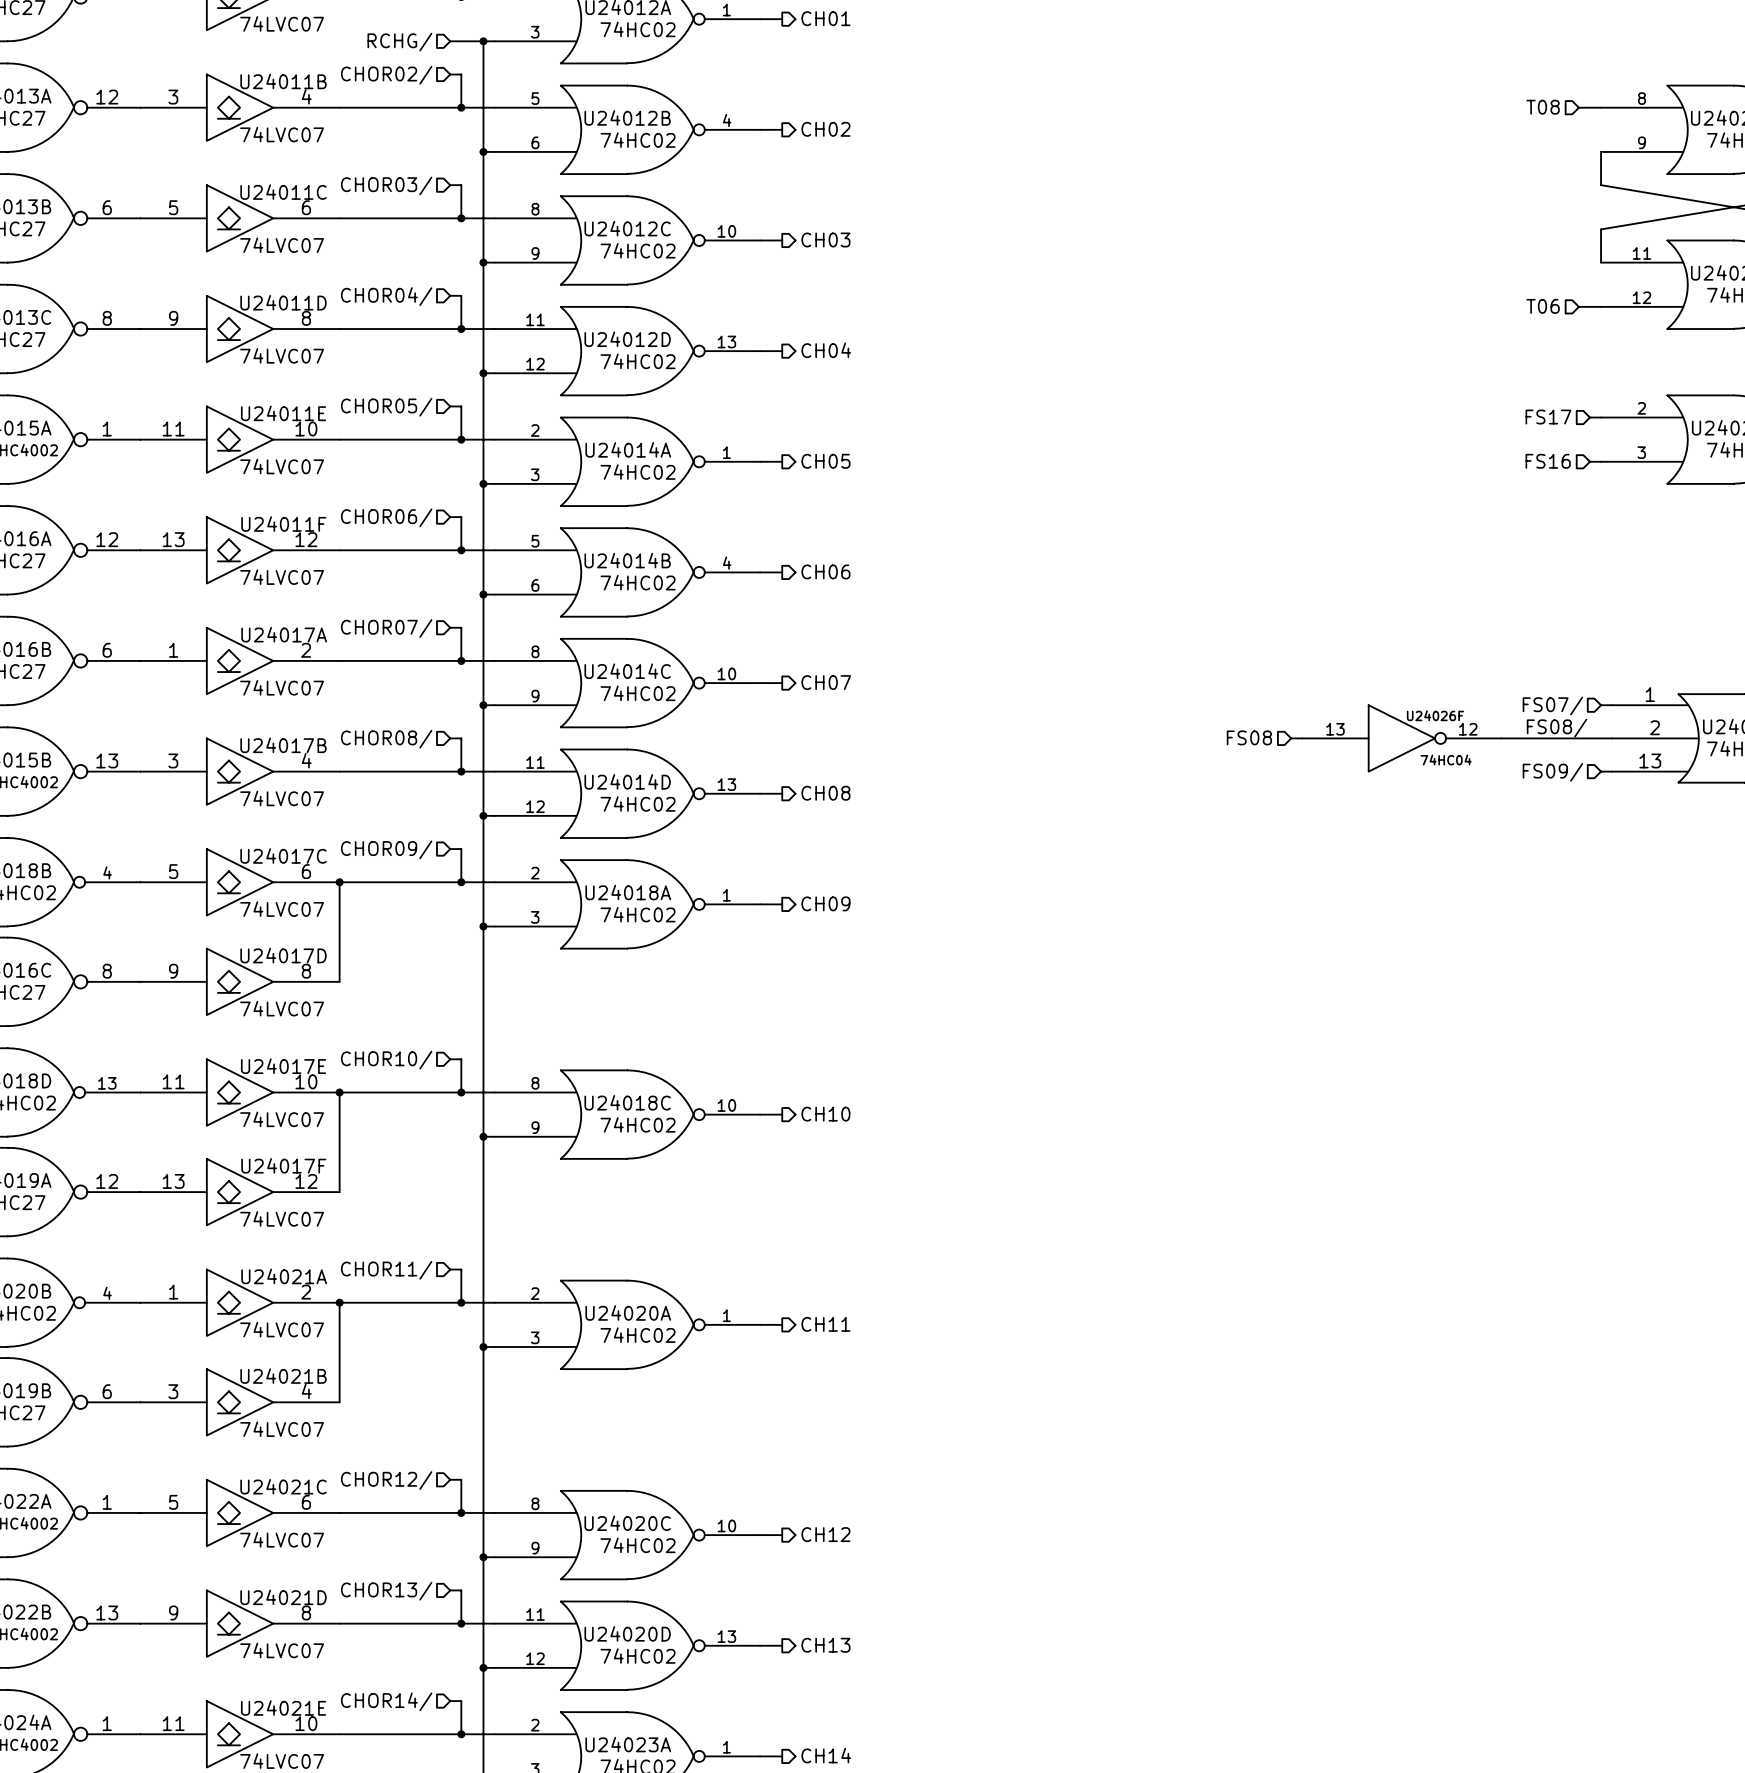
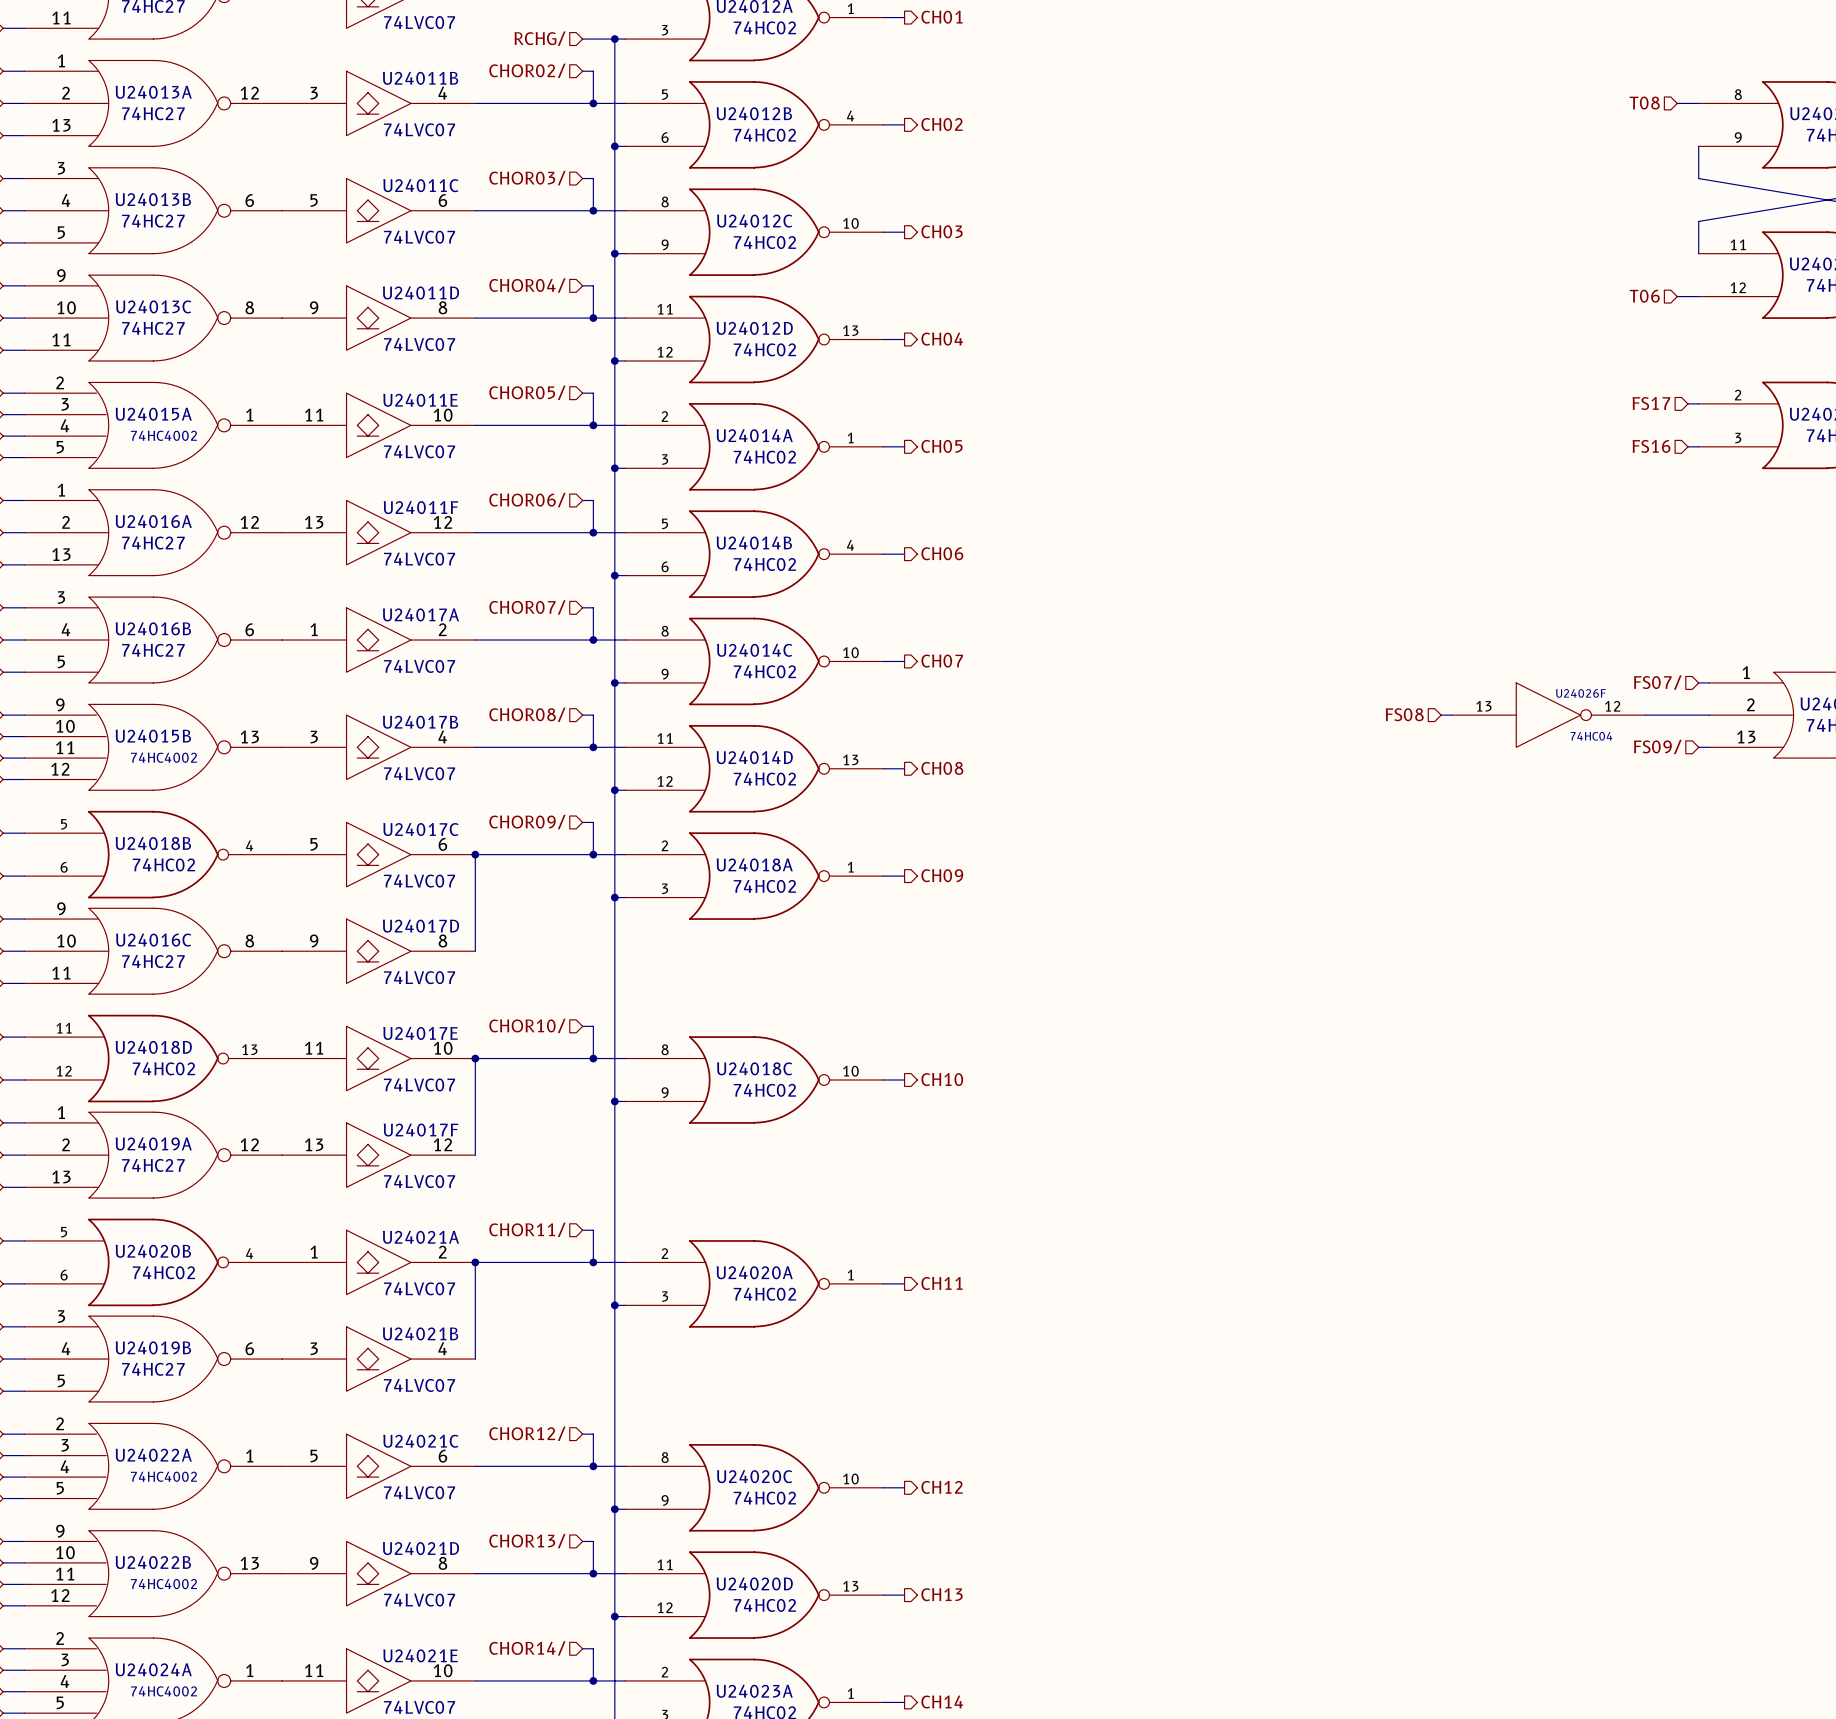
label: FS08/ (1557, 728) -> none
hierarchical label position: FS08 (1249, 737) -> FS08 (1404, 714)
U24026F position: (1401, 738) -> (1548, 715)

